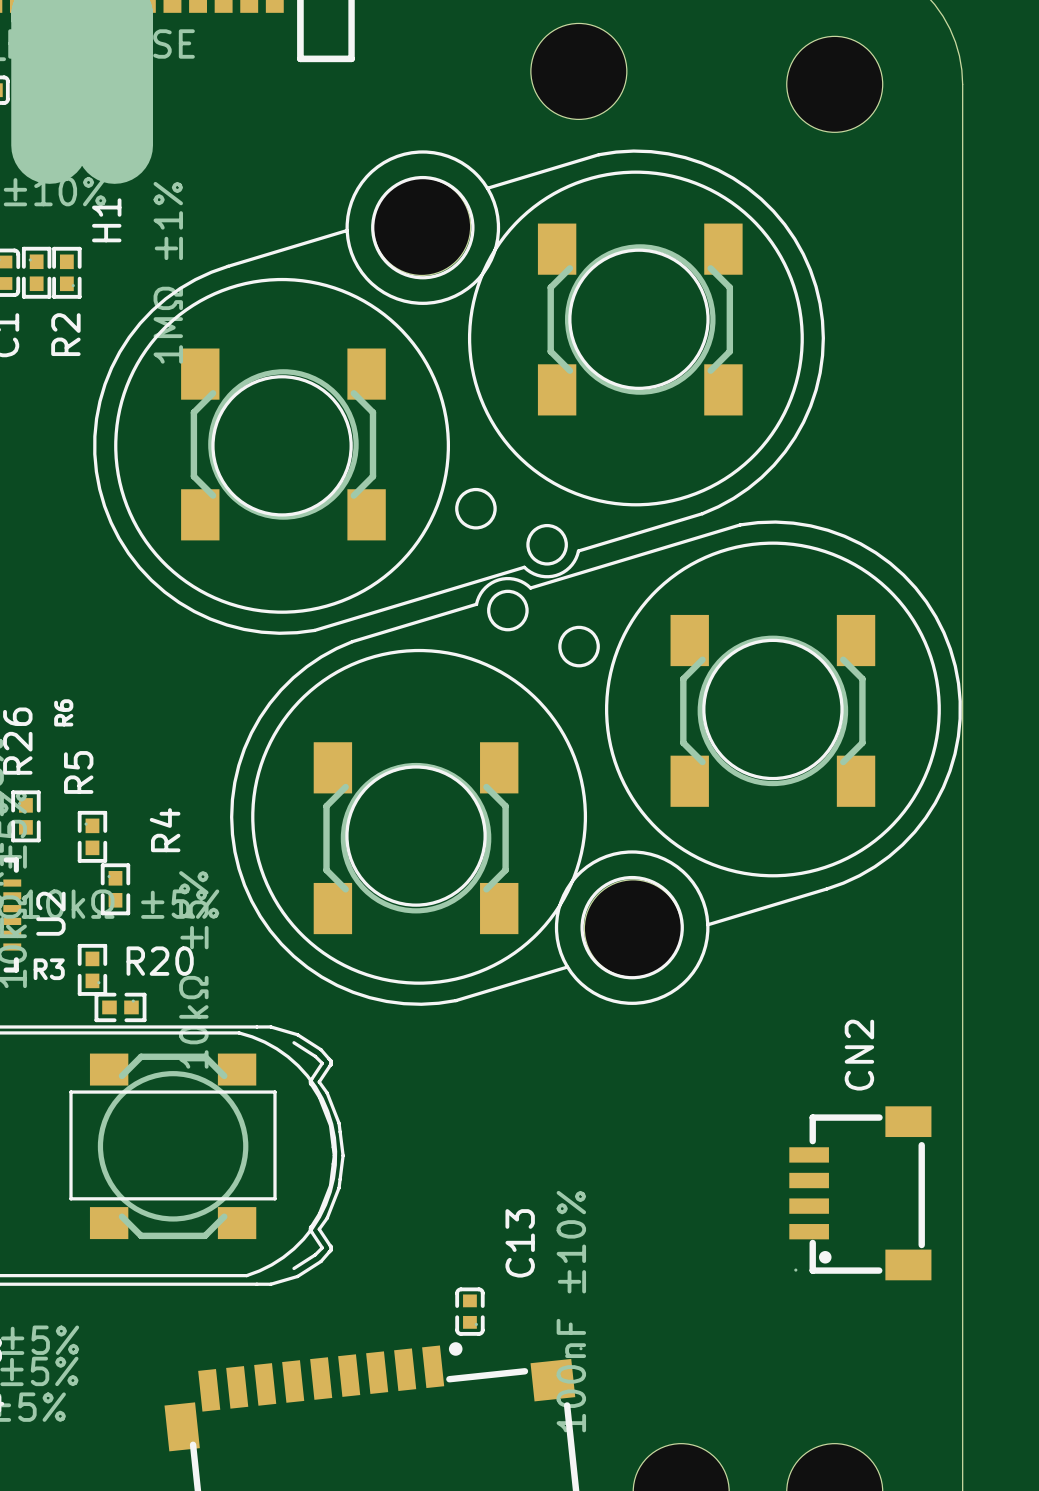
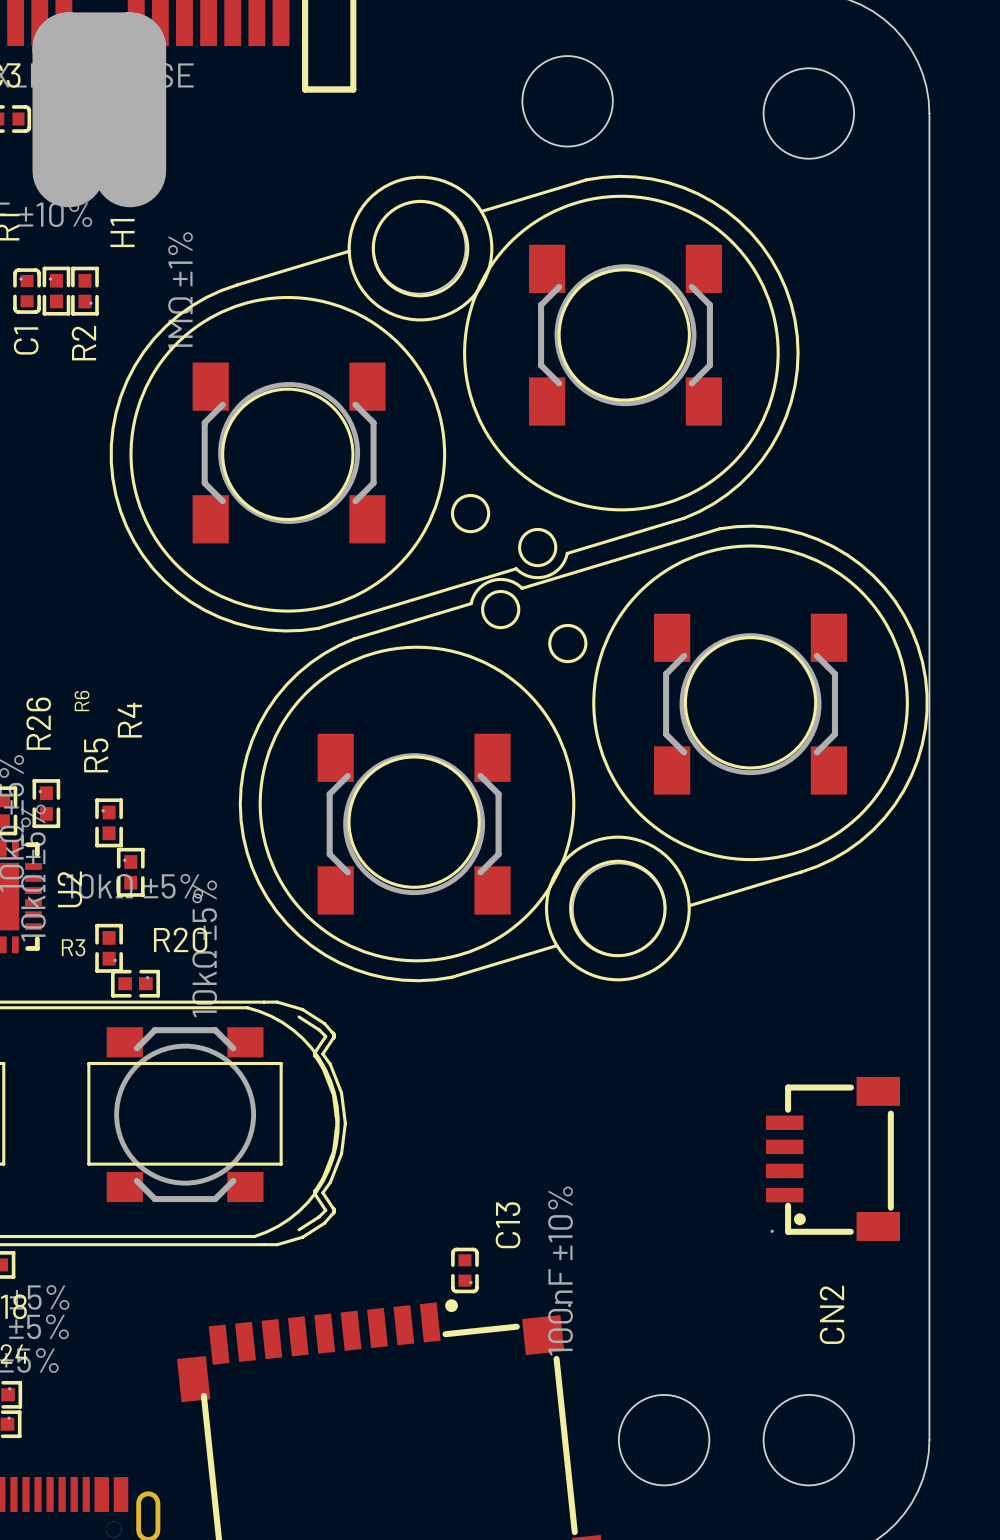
R4 name position: R4 (165, 830) -> R4 (129, 720)
CN2 name position: CN2 (859, 1055) -> CN2 (832, 1314)
C13 name position: C13 (520, 1243) -> C13 (508, 1225)

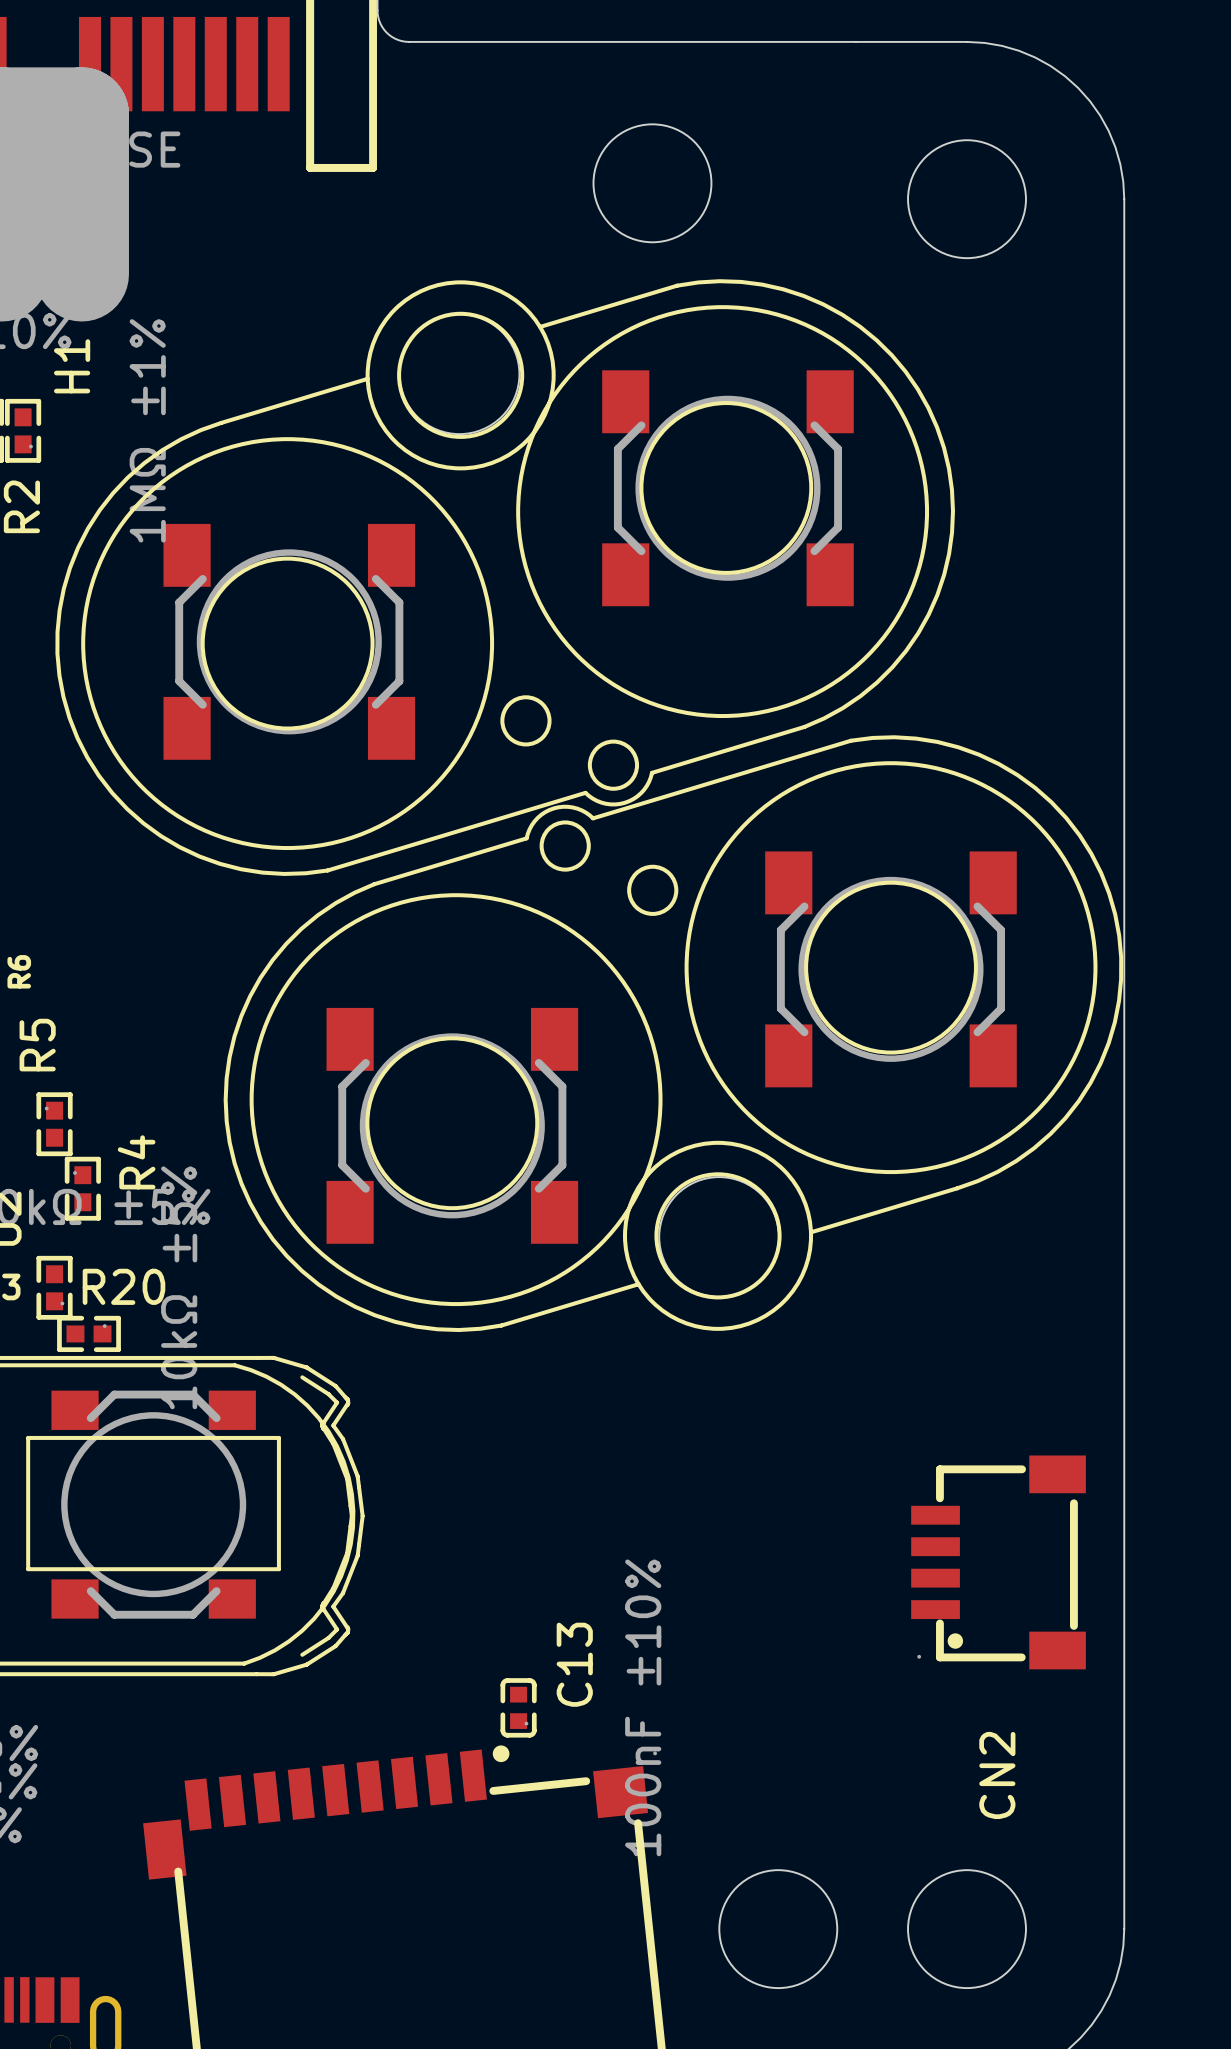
R4 name position: R4 (129, 720) -> R4 (136, 1162)
R20 name position: R20 (180, 940) -> R20 (124, 1286)

